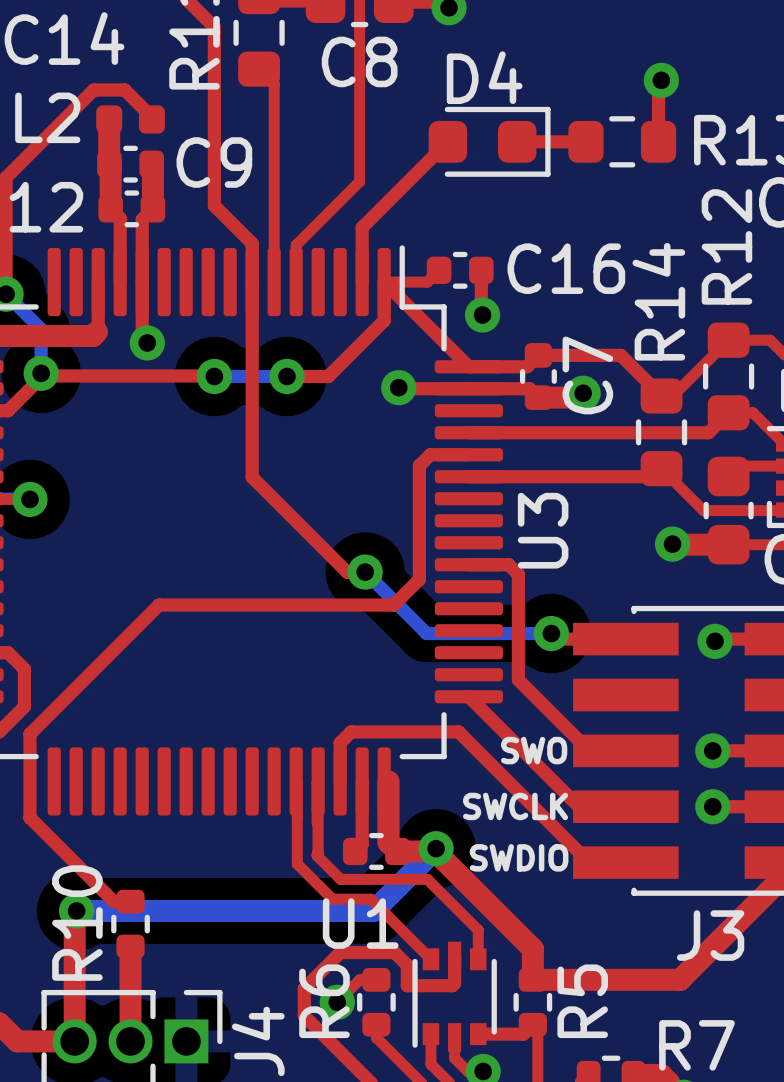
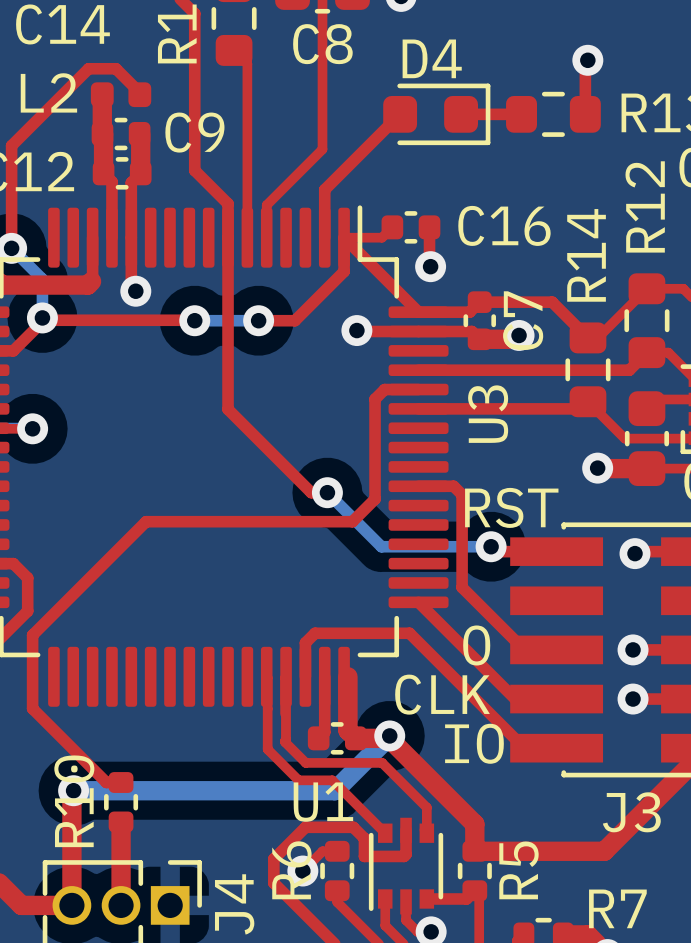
U3 name position: U3 (543, 530) -> U3 (488, 414)
text: none -> RST (511, 507)
text: SWO (534, 750) -> O (476, 645)
text: SWCLK (515, 806) -> CLK (442, 694)
text: SWDIO (519, 857) -> none
text: none -> IO (474, 743)

